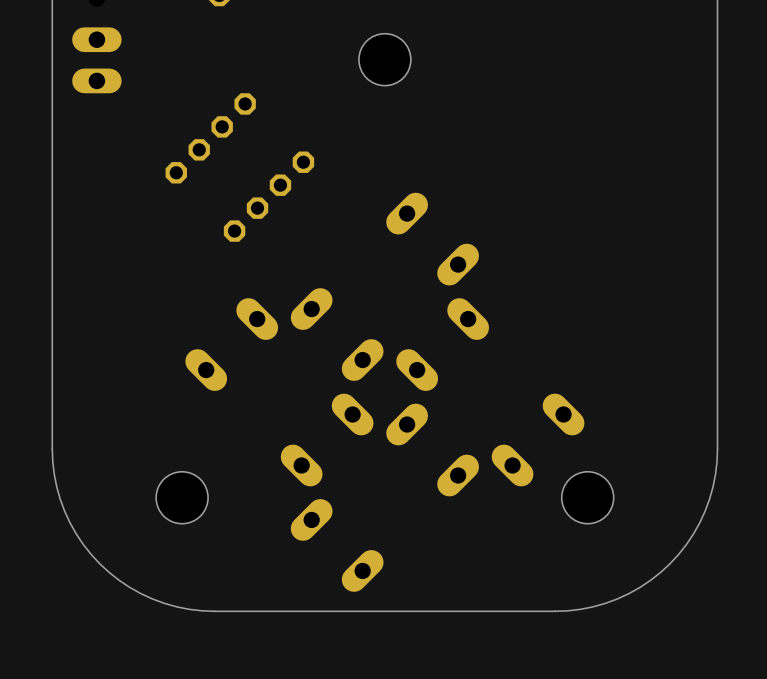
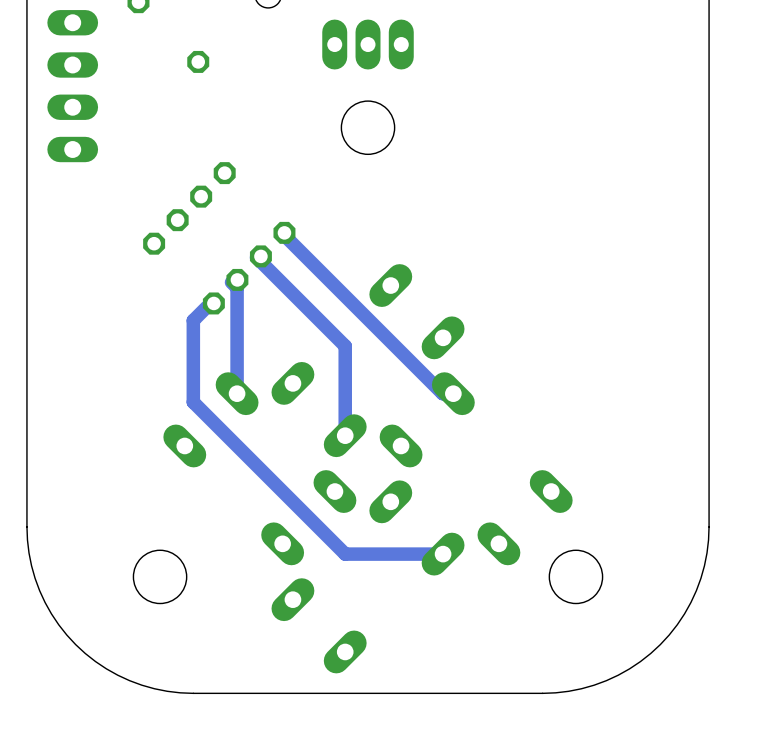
track: none -> (281, 232) (442, 393) (453, 393)
track: none -> (256, 257) (345, 346) (345, 435)
track: none -> (231, 282) (237, 287) (237, 393)
track: none -> (206, 307) (193, 320) (193, 402) (345, 554) (443, 554)

